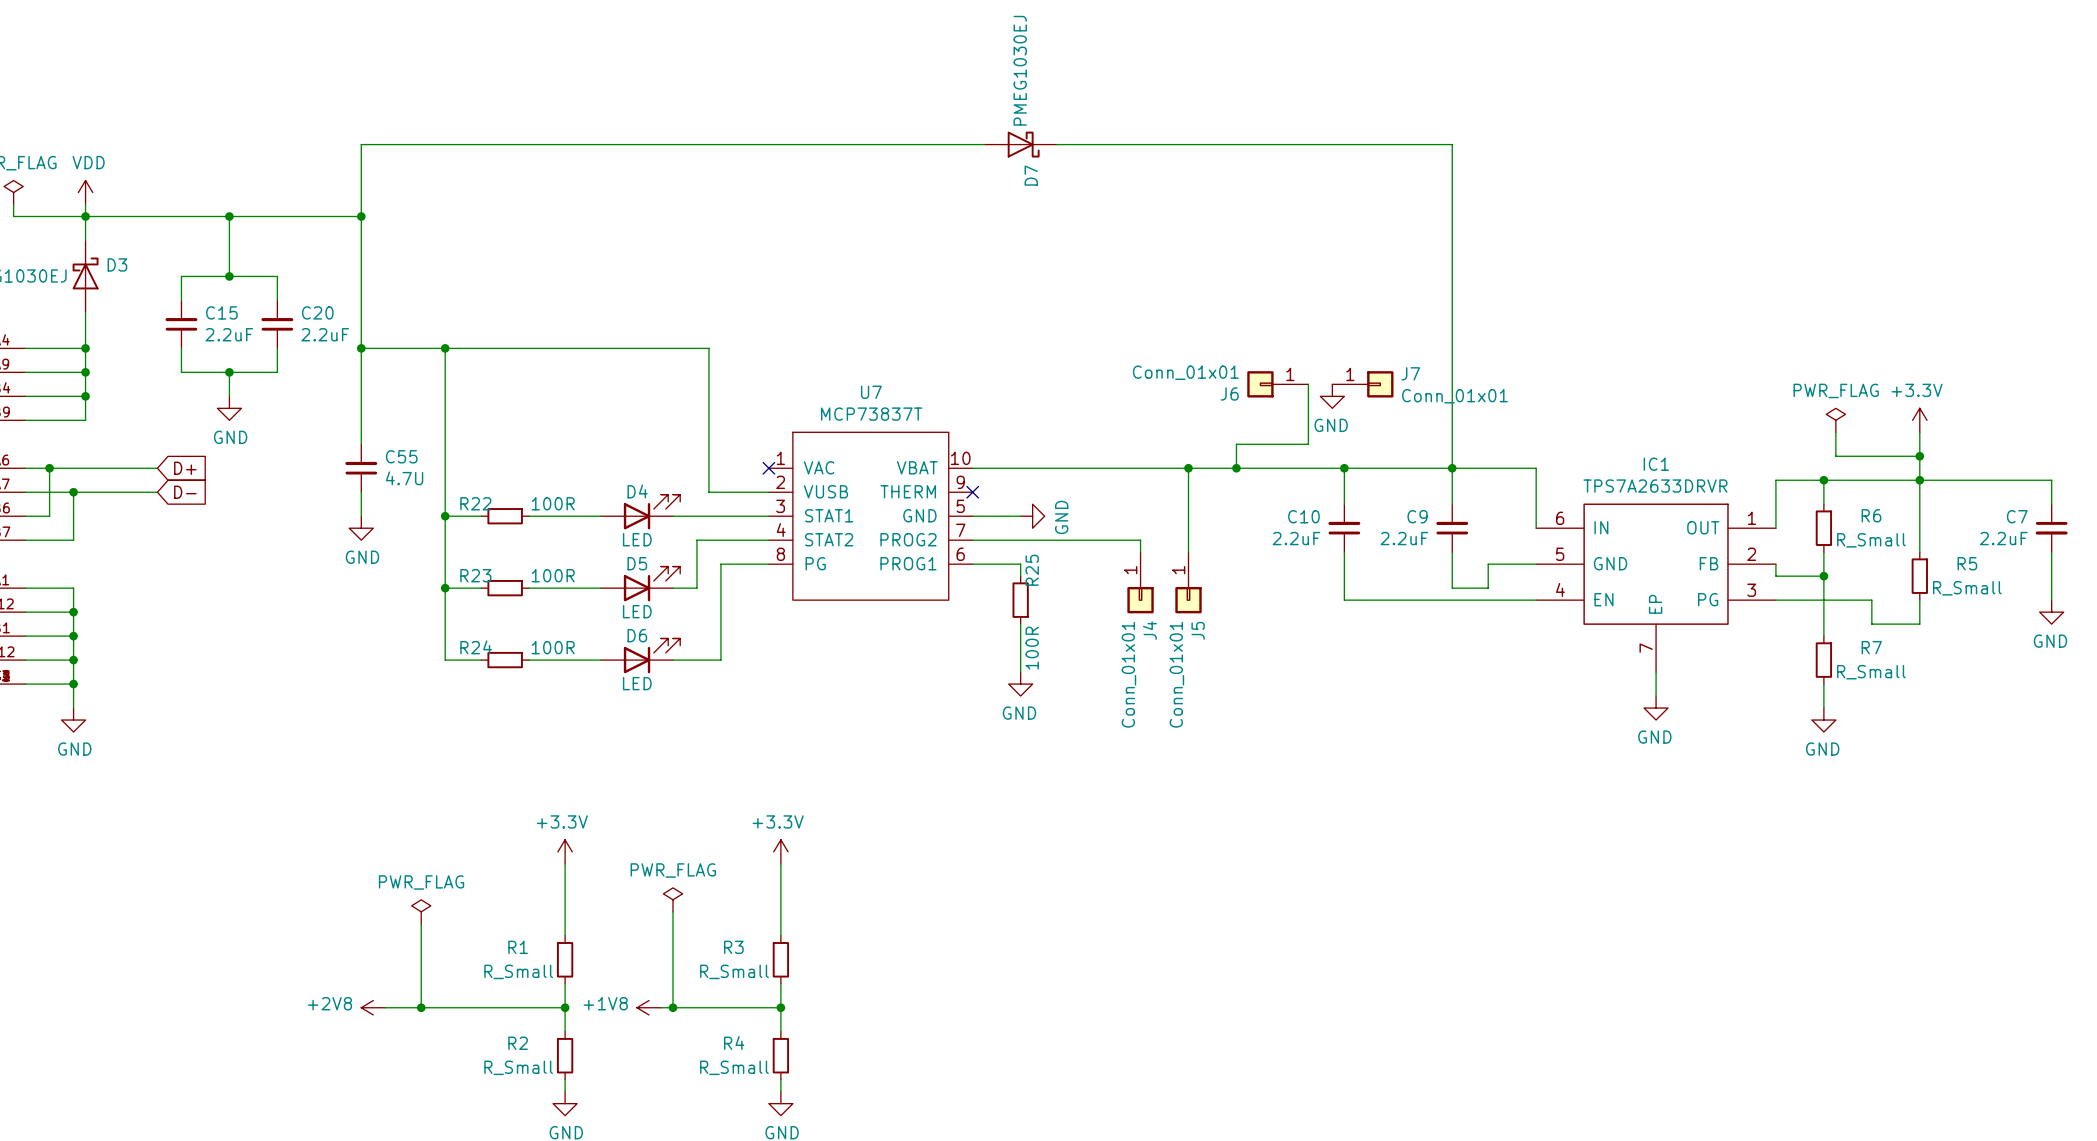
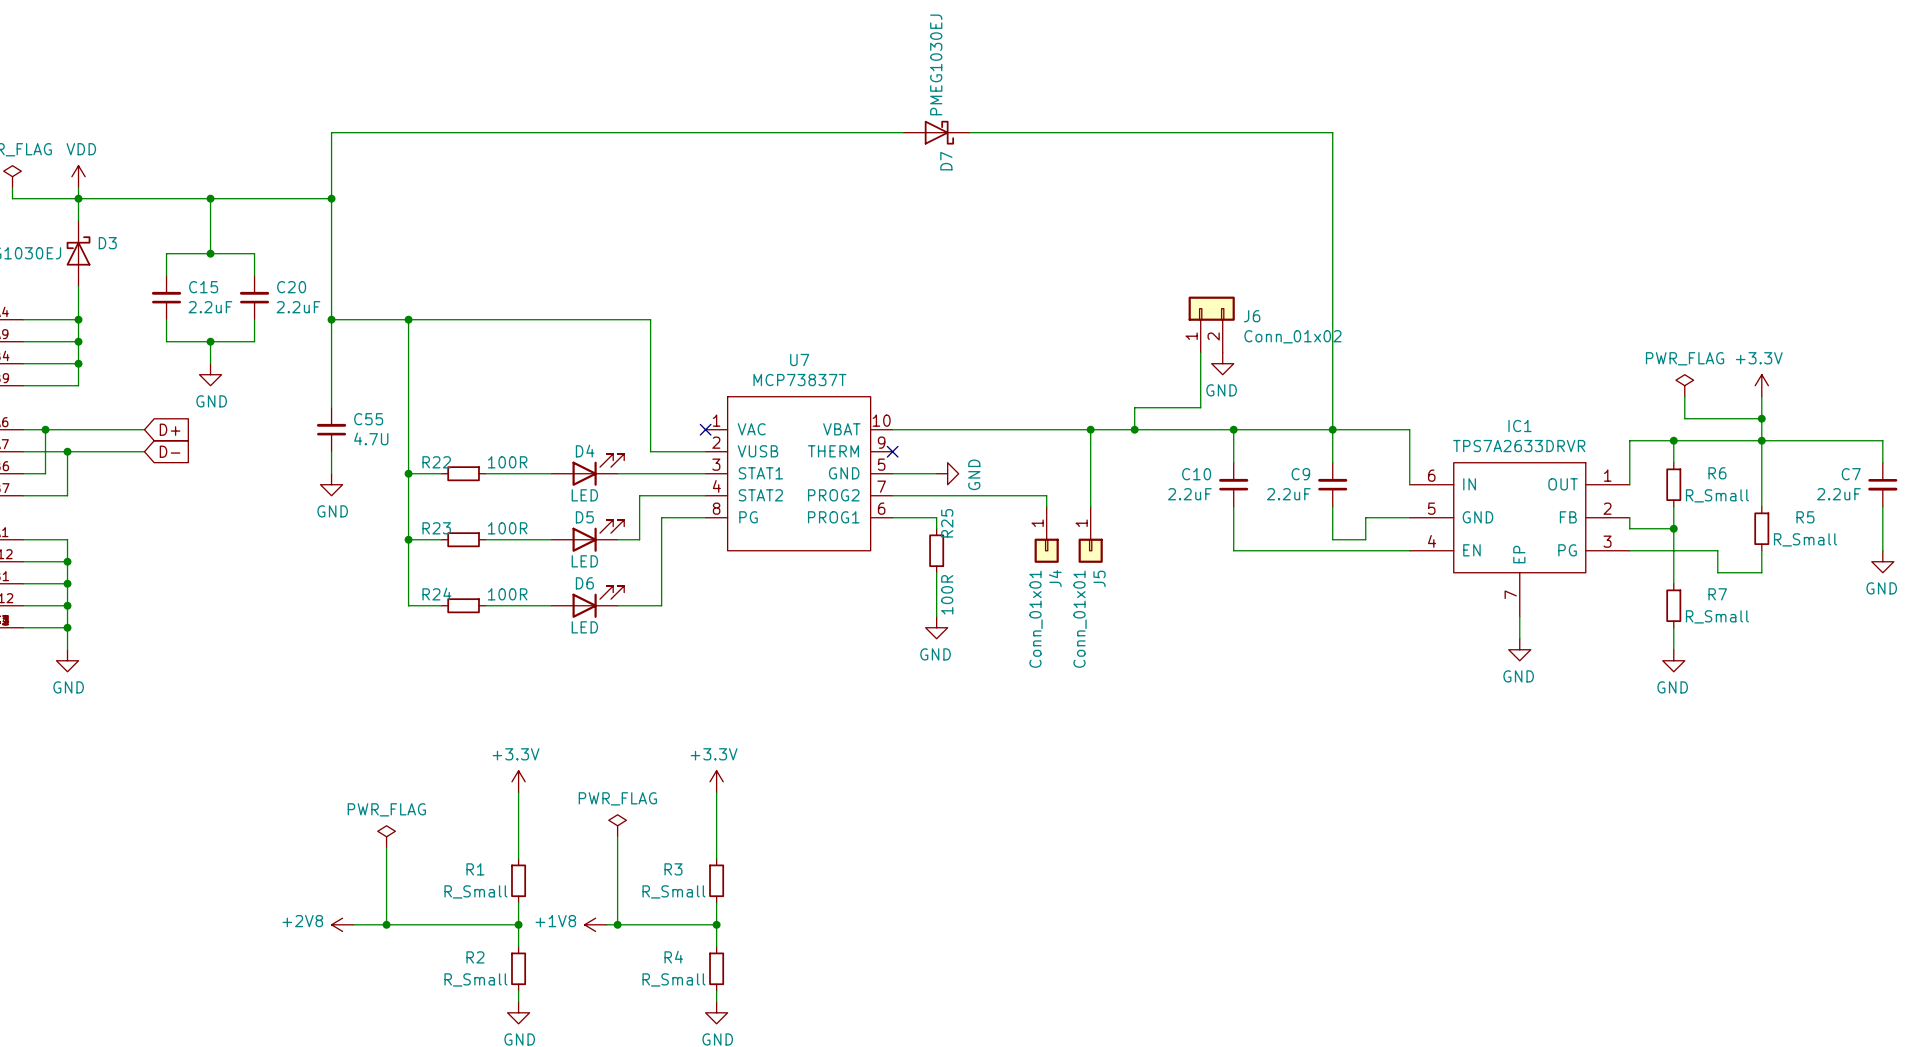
J6 symbol: [1247, 371, 1309, 398] -> [1188, 296, 1235, 353]
J6 value: Conn_01x01 (1185, 372) -> Conn_01x02 (1292, 336)
J7: Conn_01x01 (1362, 384) -> none
J6 name position: J6 (1229, 393) -> J6 (1252, 316)

